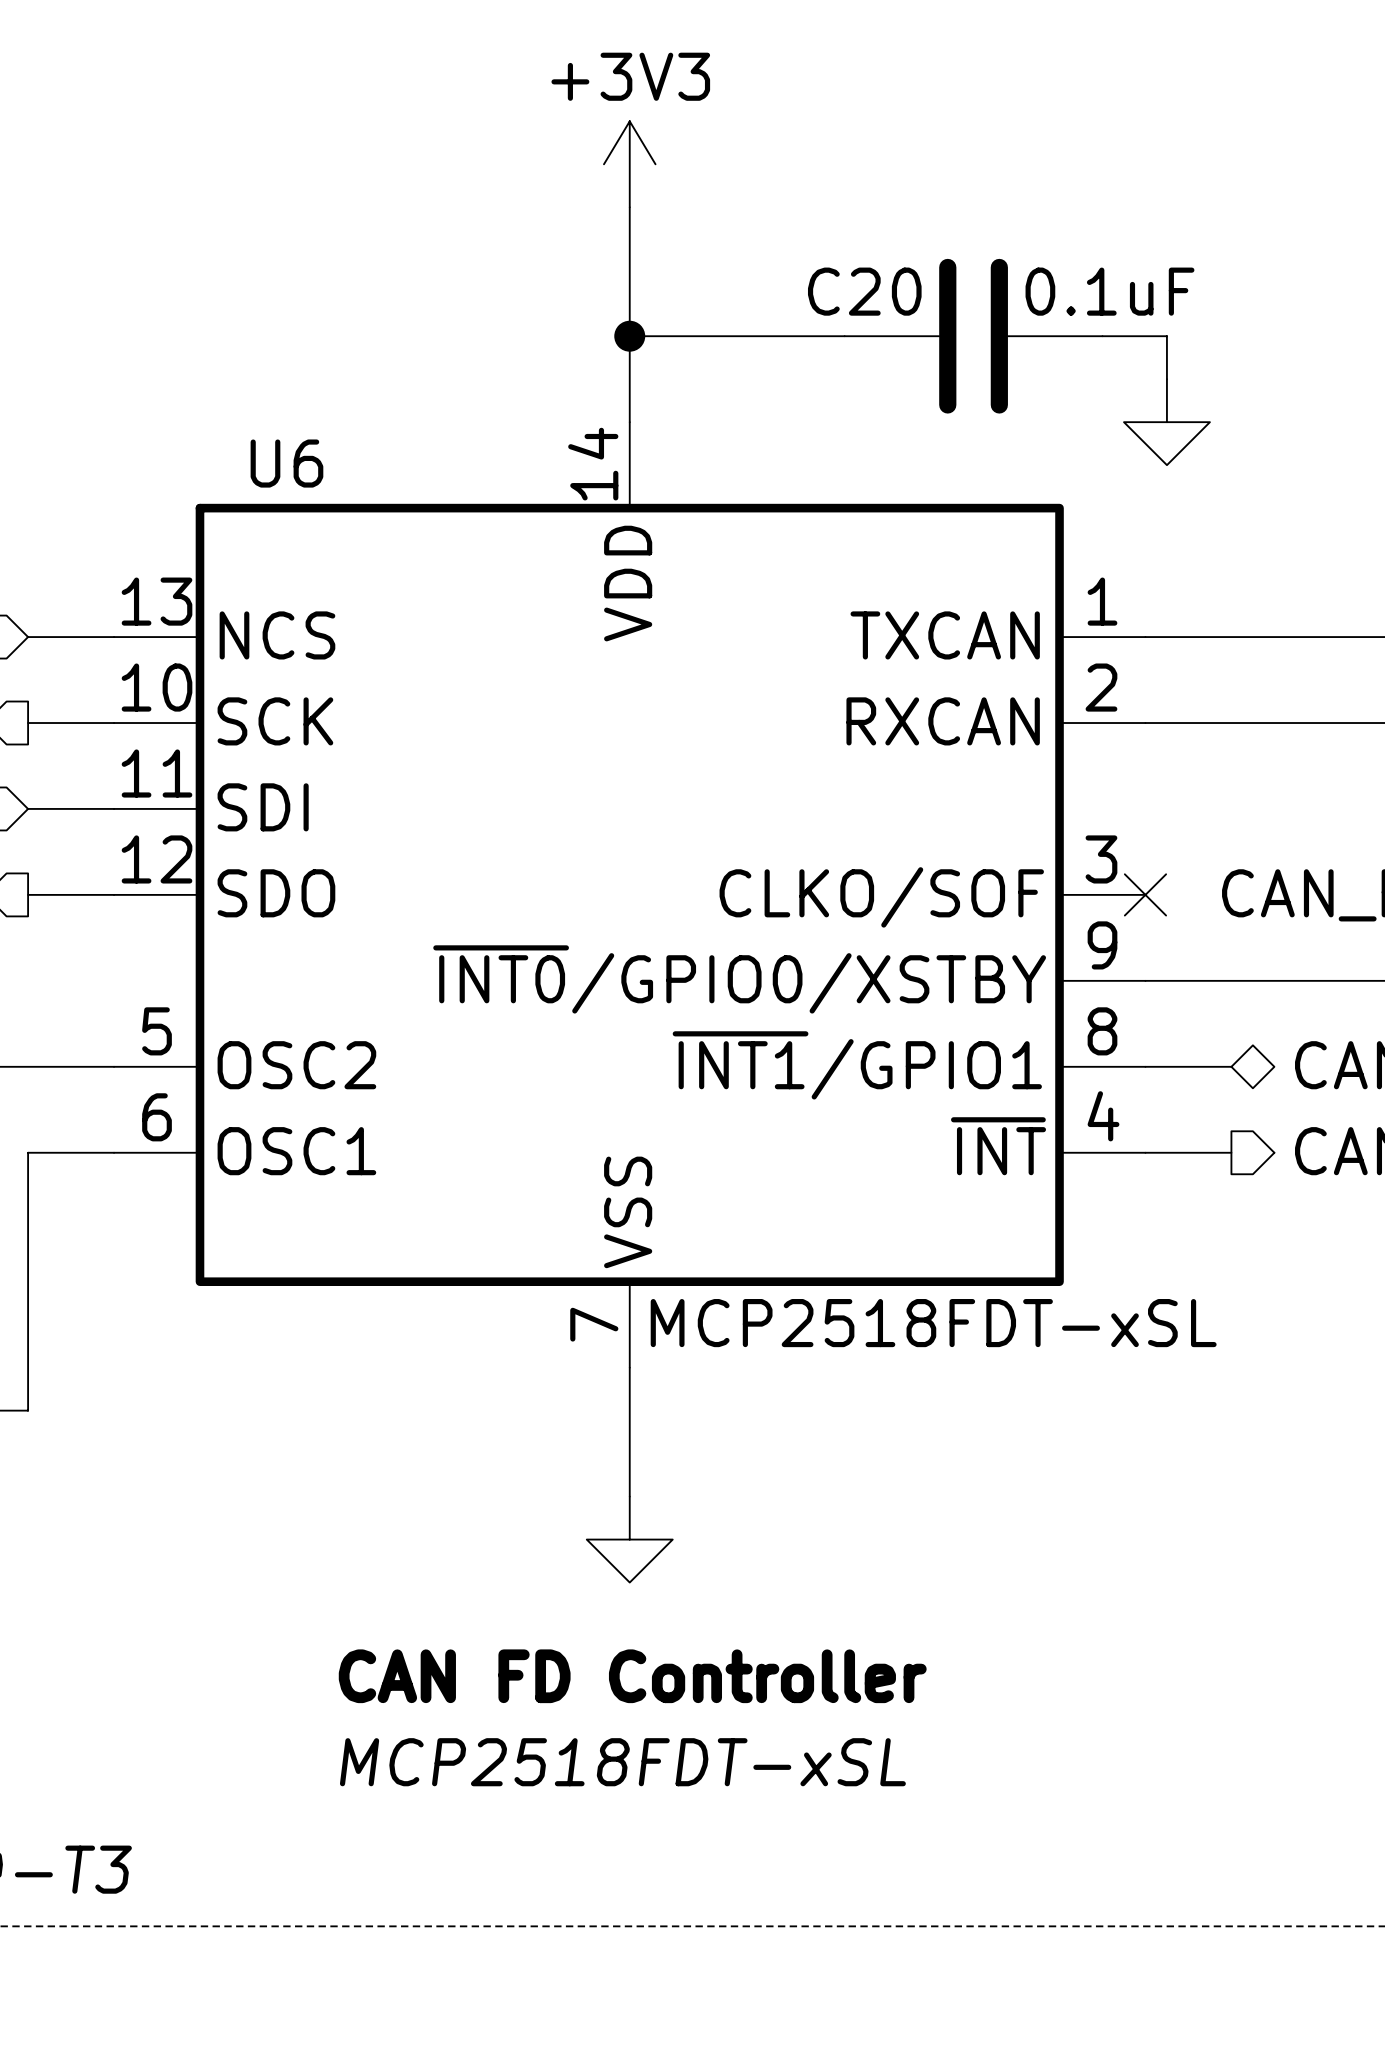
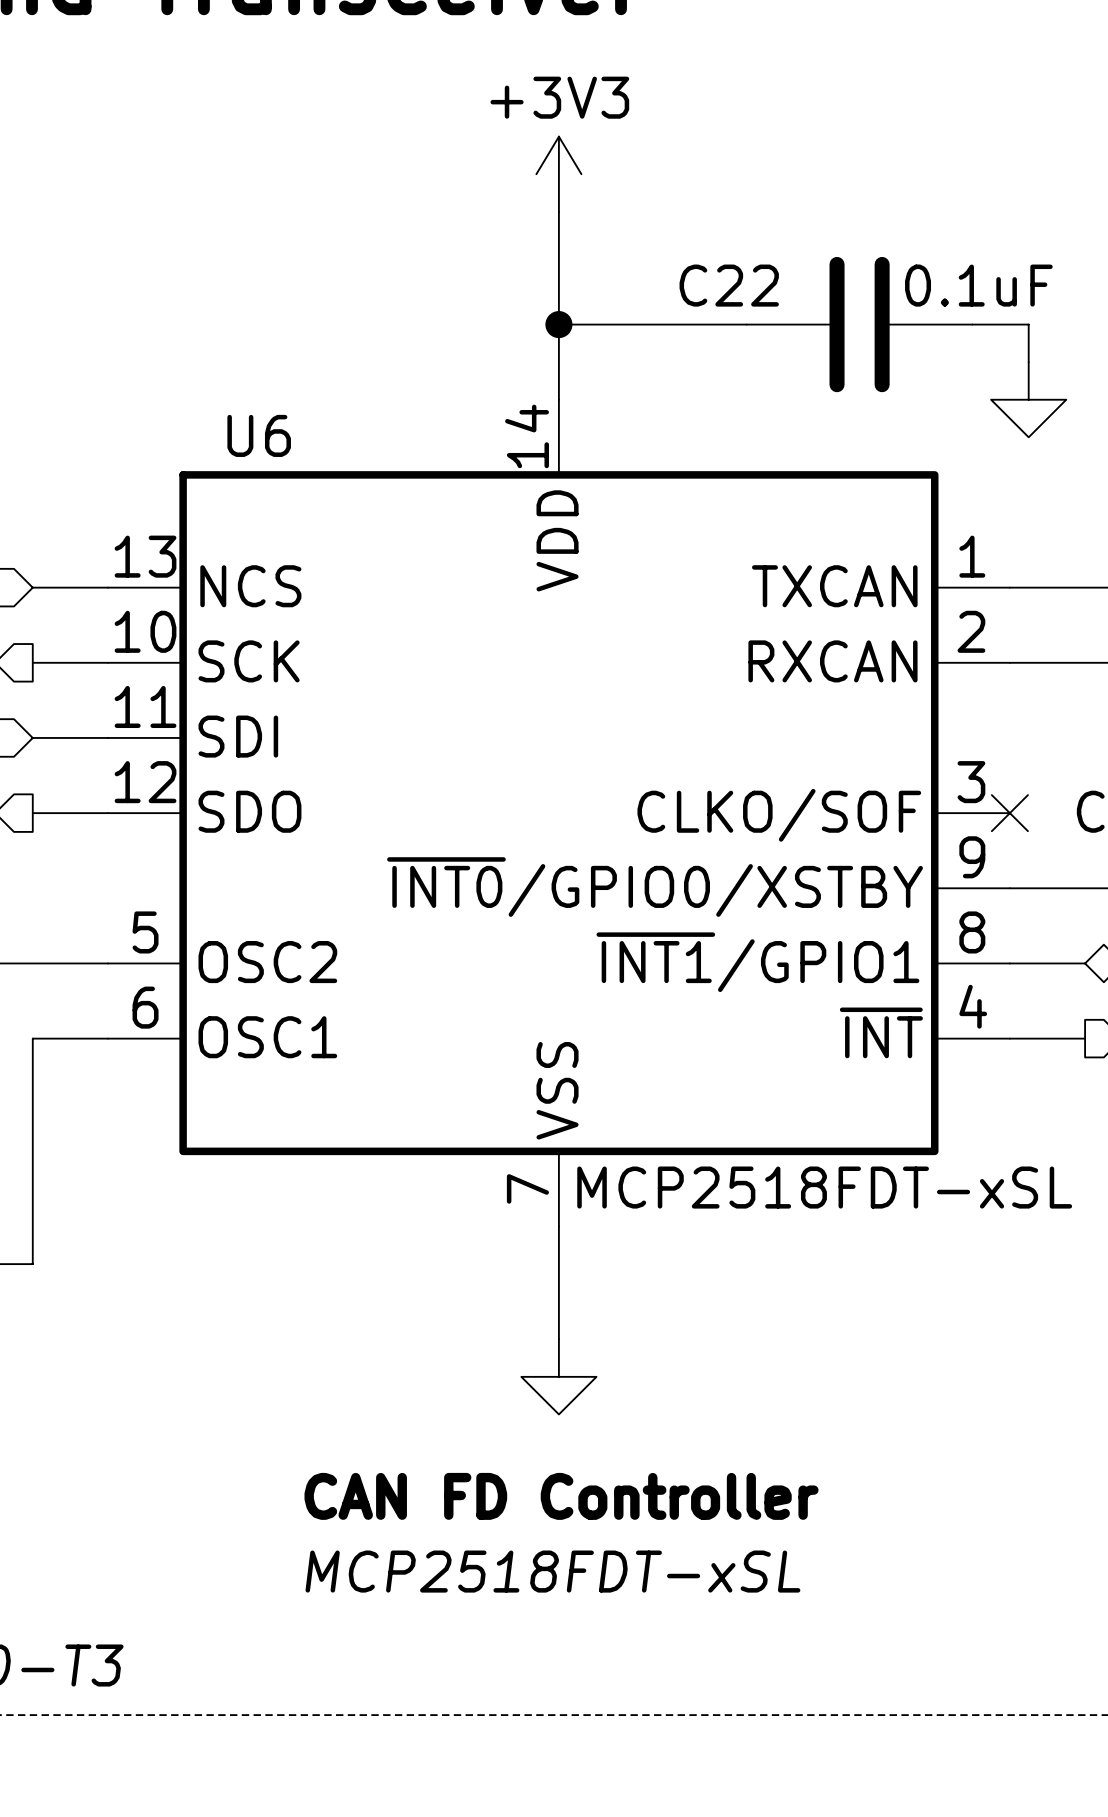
C20 name: C20 (864, 291) -> C22 (729, 285)

